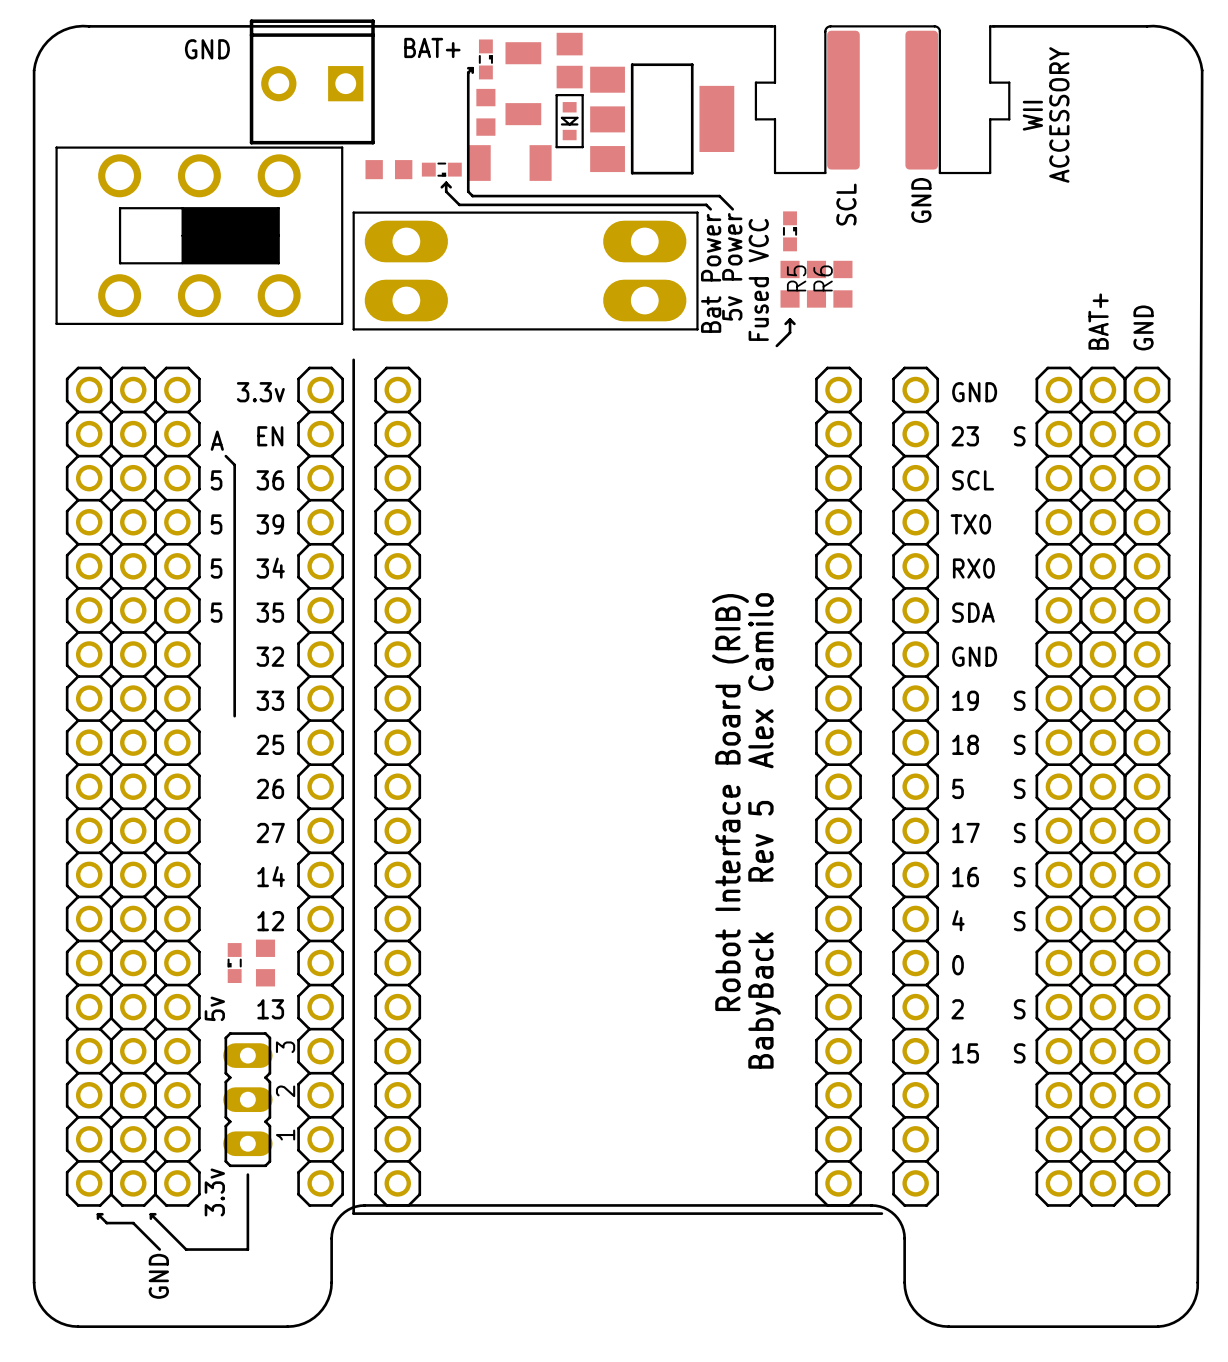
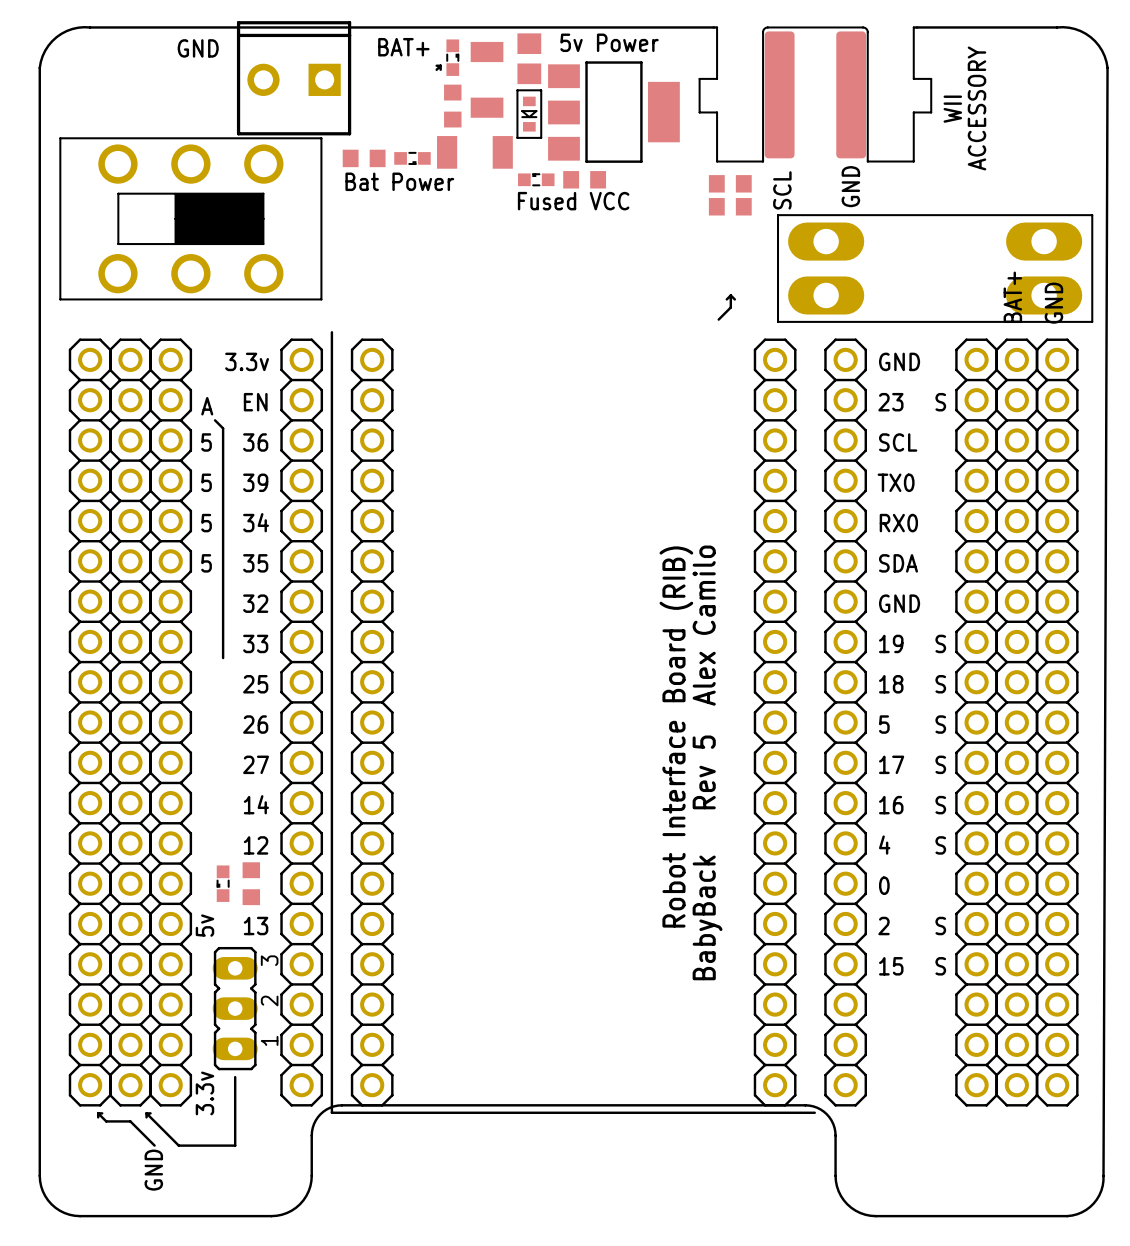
line: (468, 72) (468, 191) (472, 196) (719, 196) (732, 209) -> none
line: (446, 182) (446, 191) (459, 204) (706, 204) (710, 209) -> none
line: (446, 182) (441, 187) -> none
line: (446, 182) (450, 187) -> none
part: none -> (536, 179)
part: none -> (584, 179)
part footprint: [783, 211, 797, 252] -> [708, 198, 752, 216]
text rotation: 0° (732, 266) -> 90° clockwise (609, 42)
text position: 5v Power (732, 266) -> 5v Power (609, 42)
part: (525, 271) -> none
text rotation: 0° (711, 273) -> 90° clockwise (399, 181)
text position: Bat Power (711, 273) -> Bat Power (399, 181)
text rotation: 0° (758, 279) -> 90° clockwise (573, 201)
text position: Fused VCC (758, 279) -> Fused VCC (573, 201)
part rotation: 0° (790, 284) -> 90° clockwise (730, 183)
part position: (790, 284) -> (730, 183)
R5: (816, 284) -> none
R6: (842, 284) -> none
part: none -> (935, 268)

